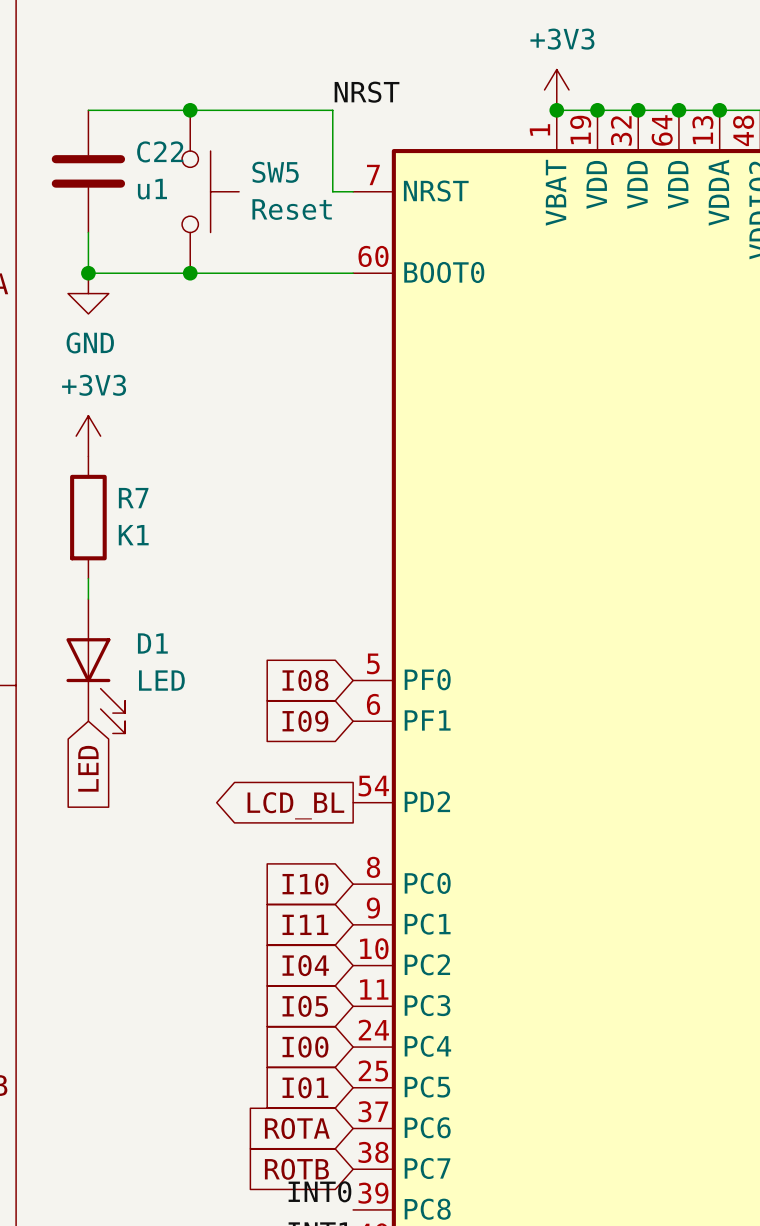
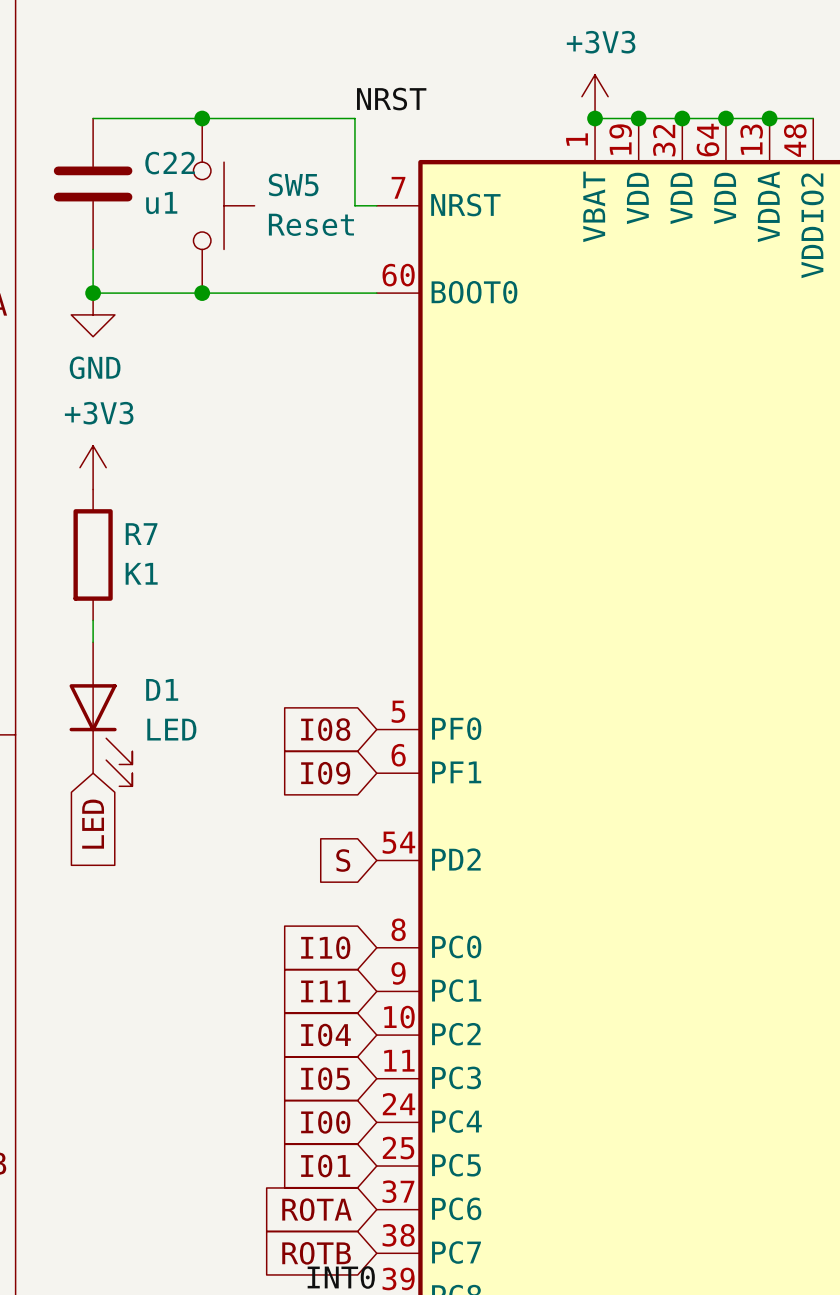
global label shape: output (295, 805) -> input (343, 860)
global label: LCD_BL (295, 805) -> S (343, 860)

